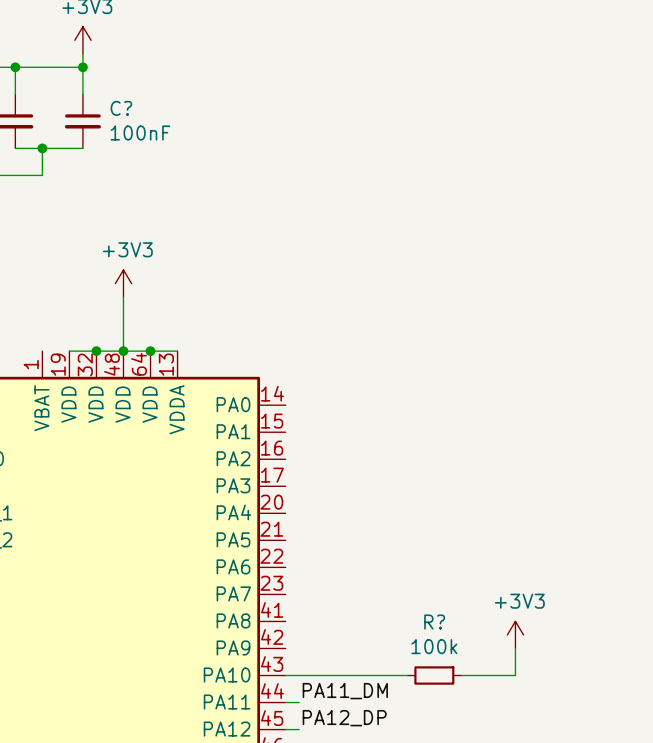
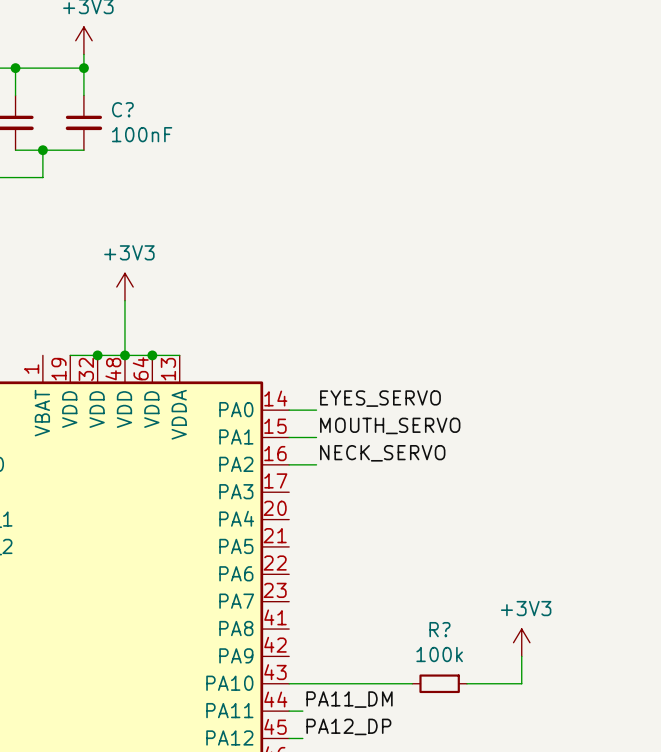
label: none -> EYES_SERVO (380, 398)
wire: none -> (289, 410) (316, 410)
label: none -> MOUTH_SERVO (390, 425)
wire: none -> (289, 437) (316, 437)
label: none -> NECK_SERVO (382, 453)
wire: none -> (289, 464) (316, 464)

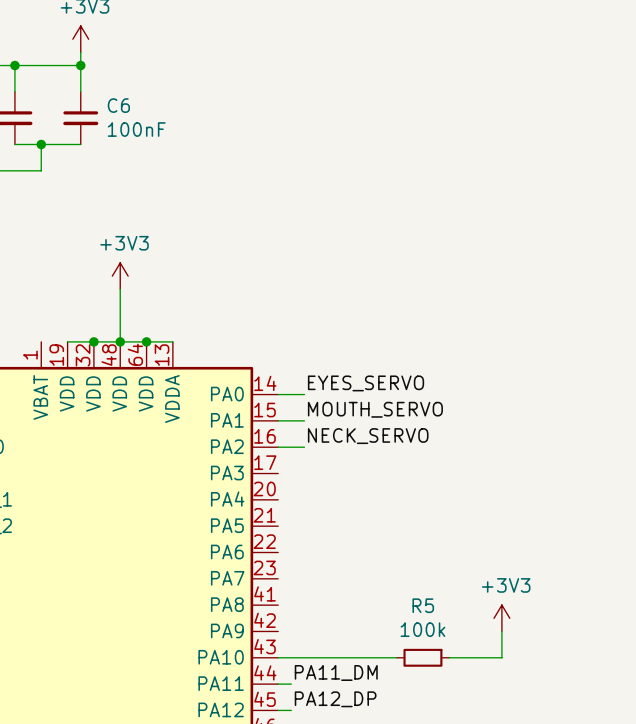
C? name: C? (122, 109) -> C6 (118, 105)
R? name: R? (439, 629) -> R5 (423, 605)

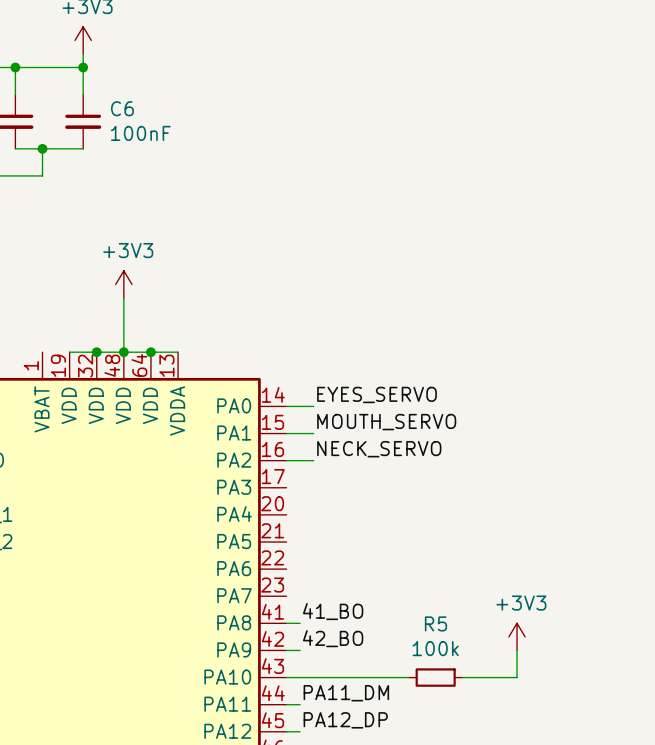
label: none -> 41_BO (333, 611)
wire: none -> (286, 623) (300, 623)
label: none -> 42_BO (333, 638)
wire: none -> (286, 650) (300, 650)

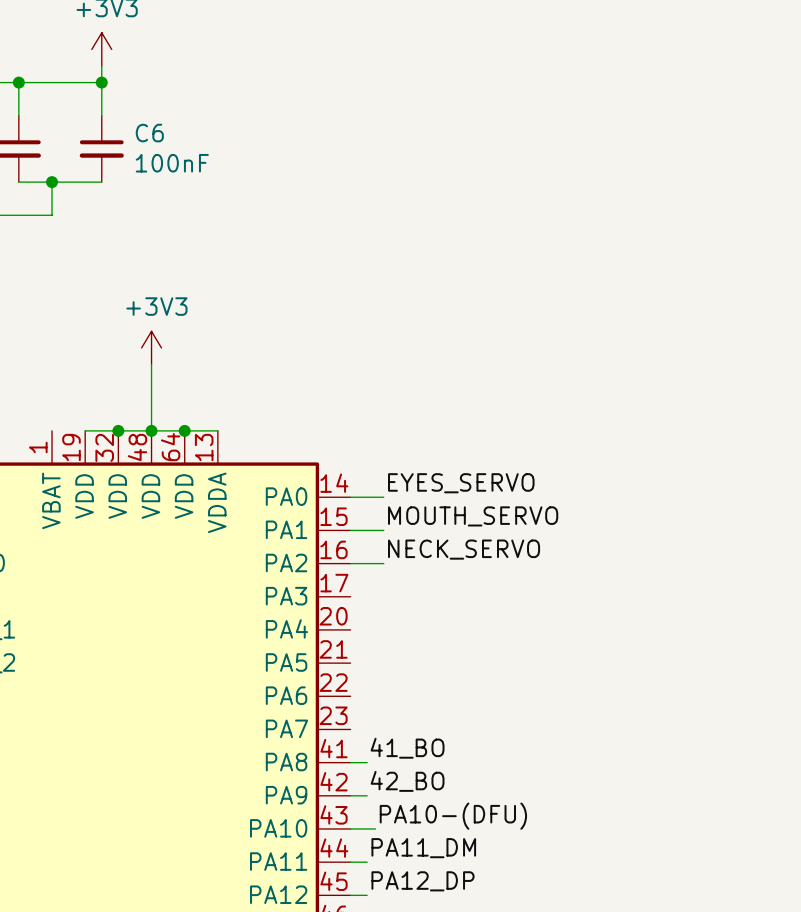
power symbol: +3V3 (517, 636) -> none
wire: (517, 650) (517, 677) (462, 677) -> none
label: none -> PA10-(DFU) (453, 816)
wire: (306, 677) (408, 677) -> none
R5: 100k (435, 677) -> none

